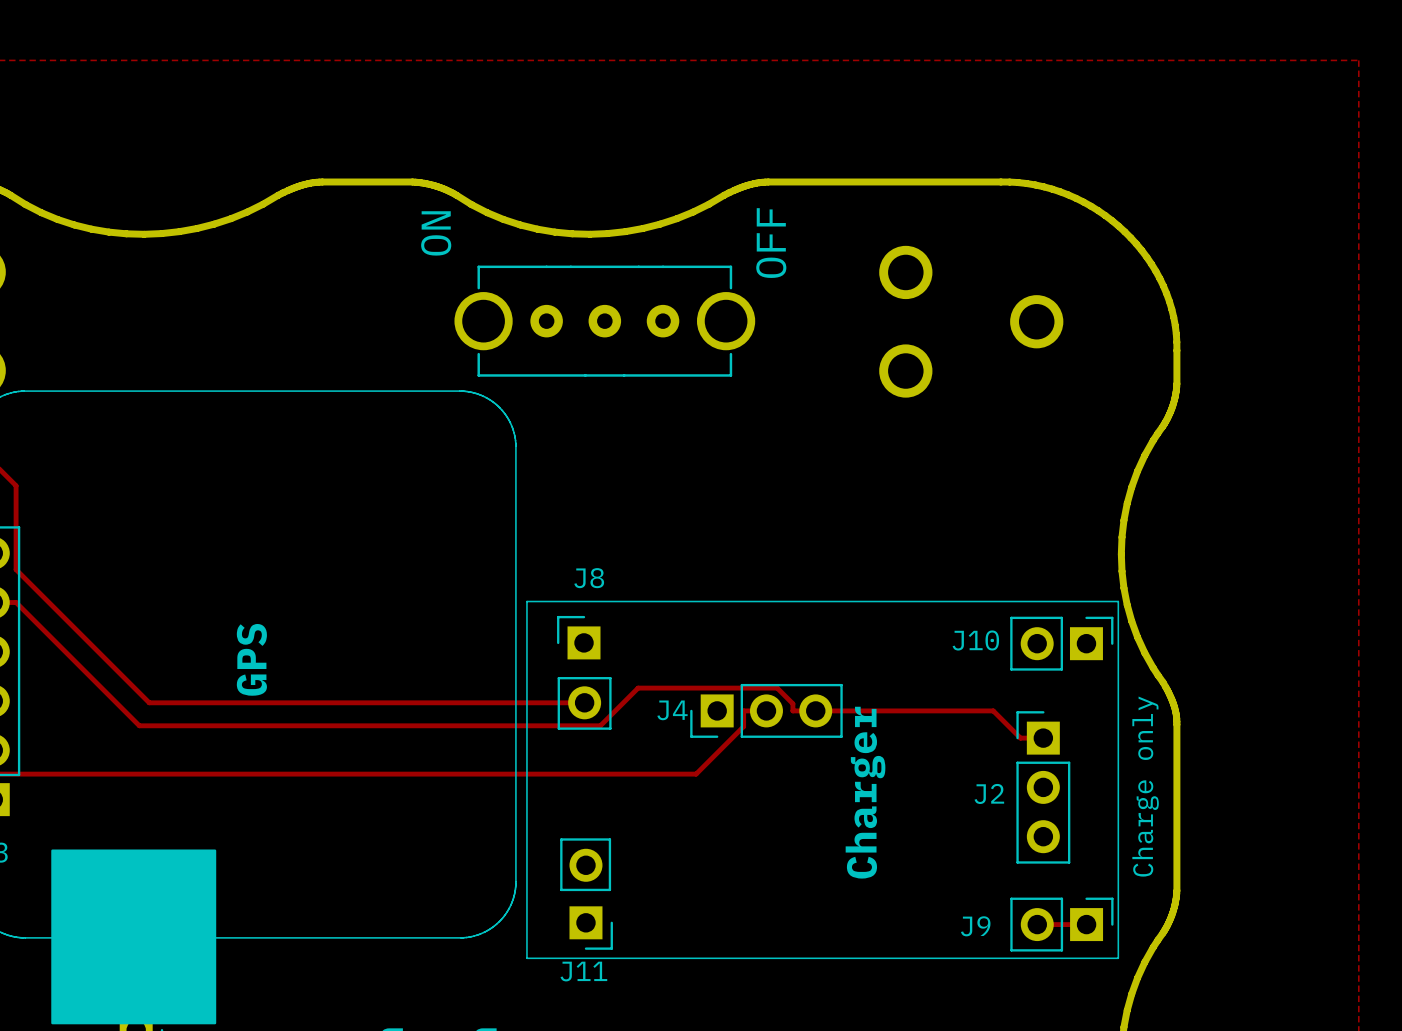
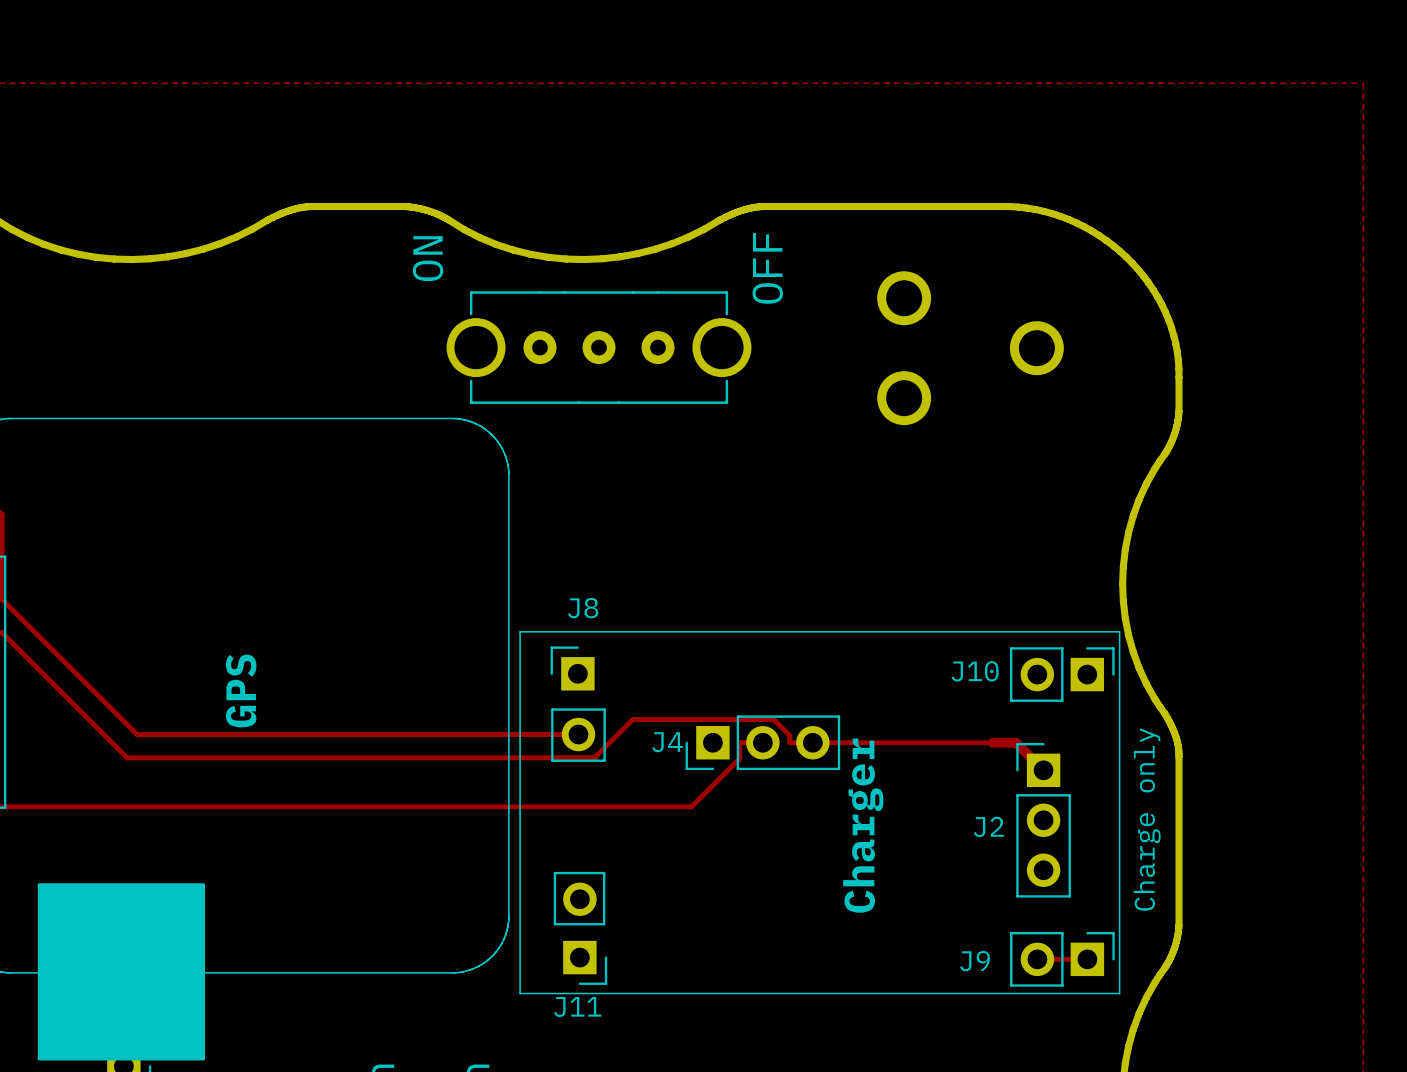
track: (993, 710) (1020, 738) (1043, 738) -> (992, 742) (1016, 742) (1043, 770)

